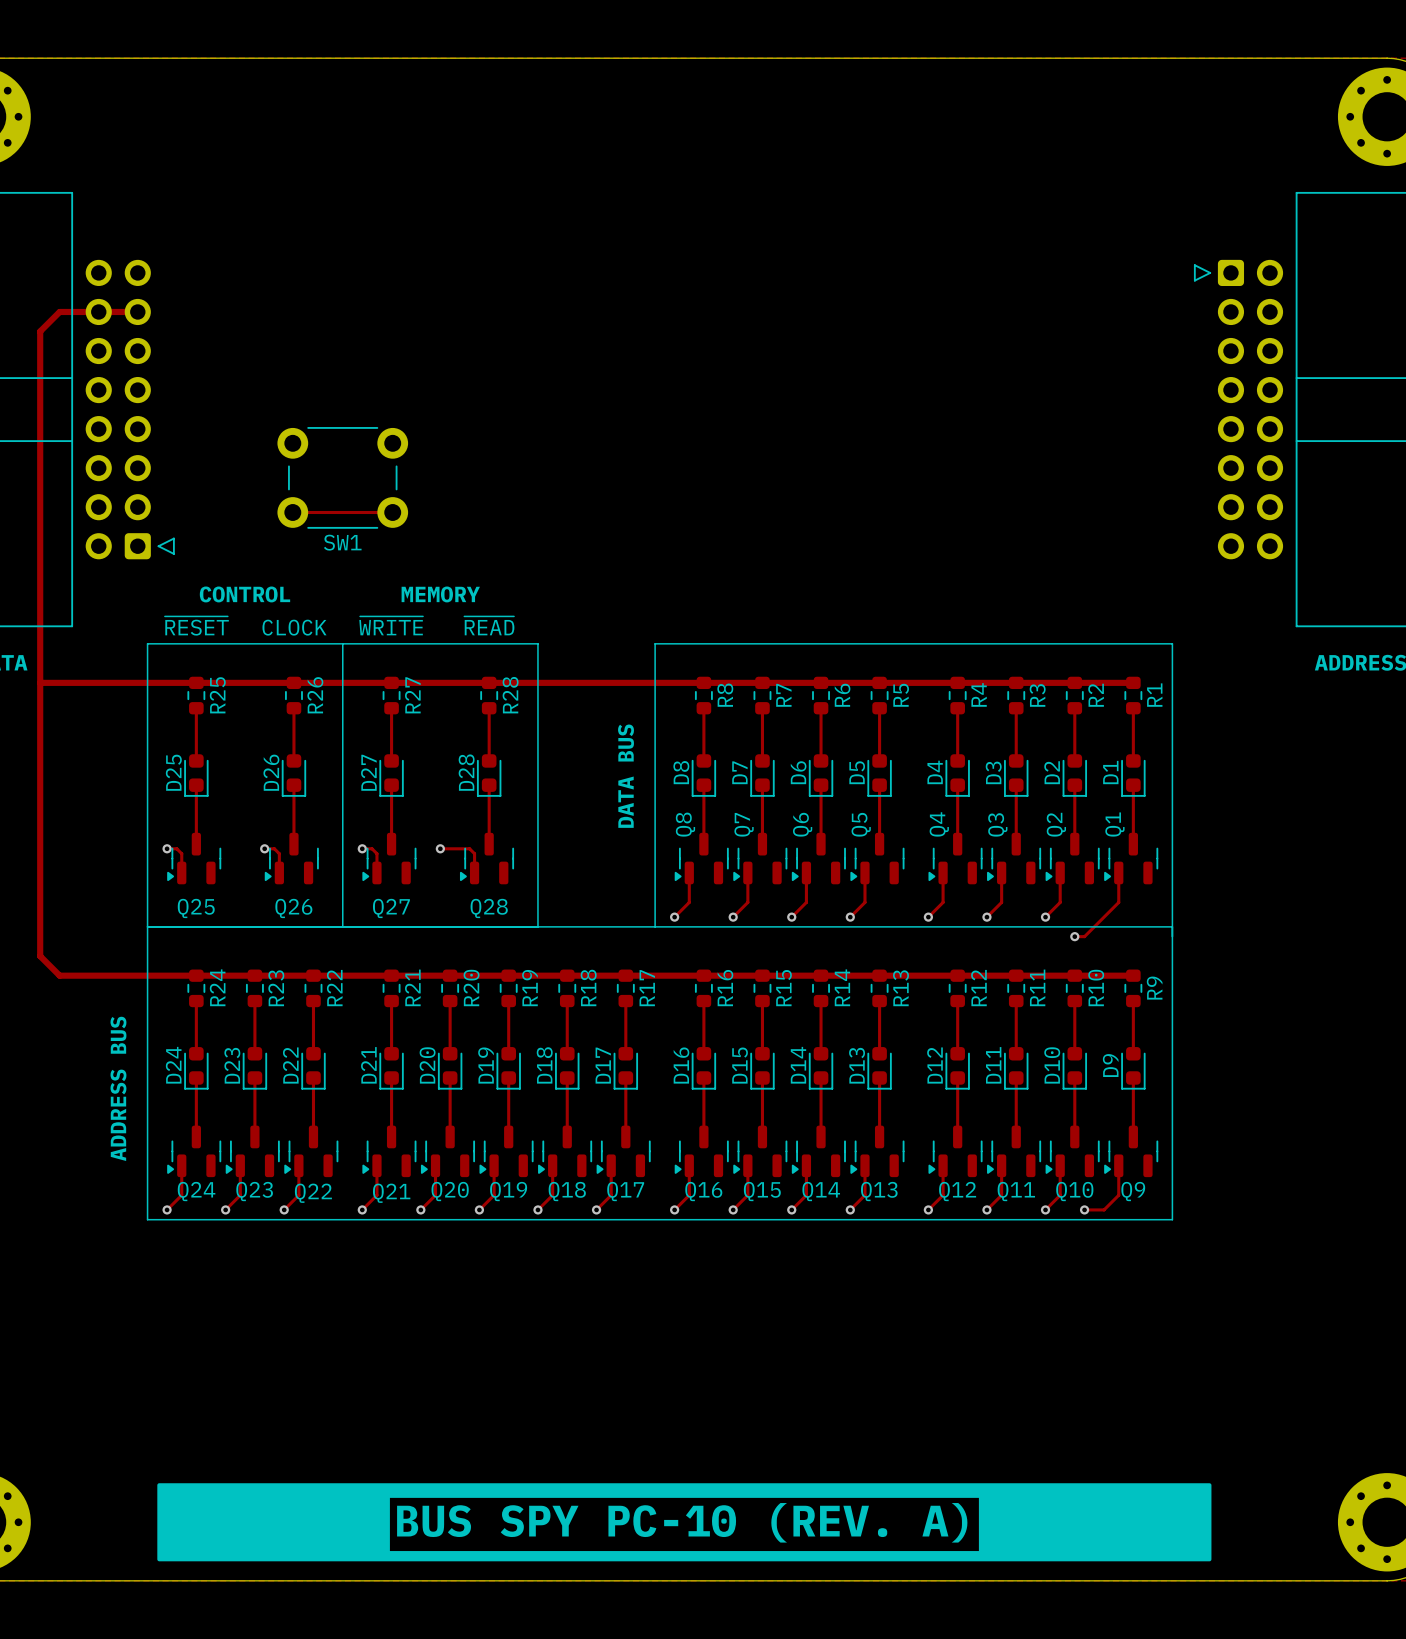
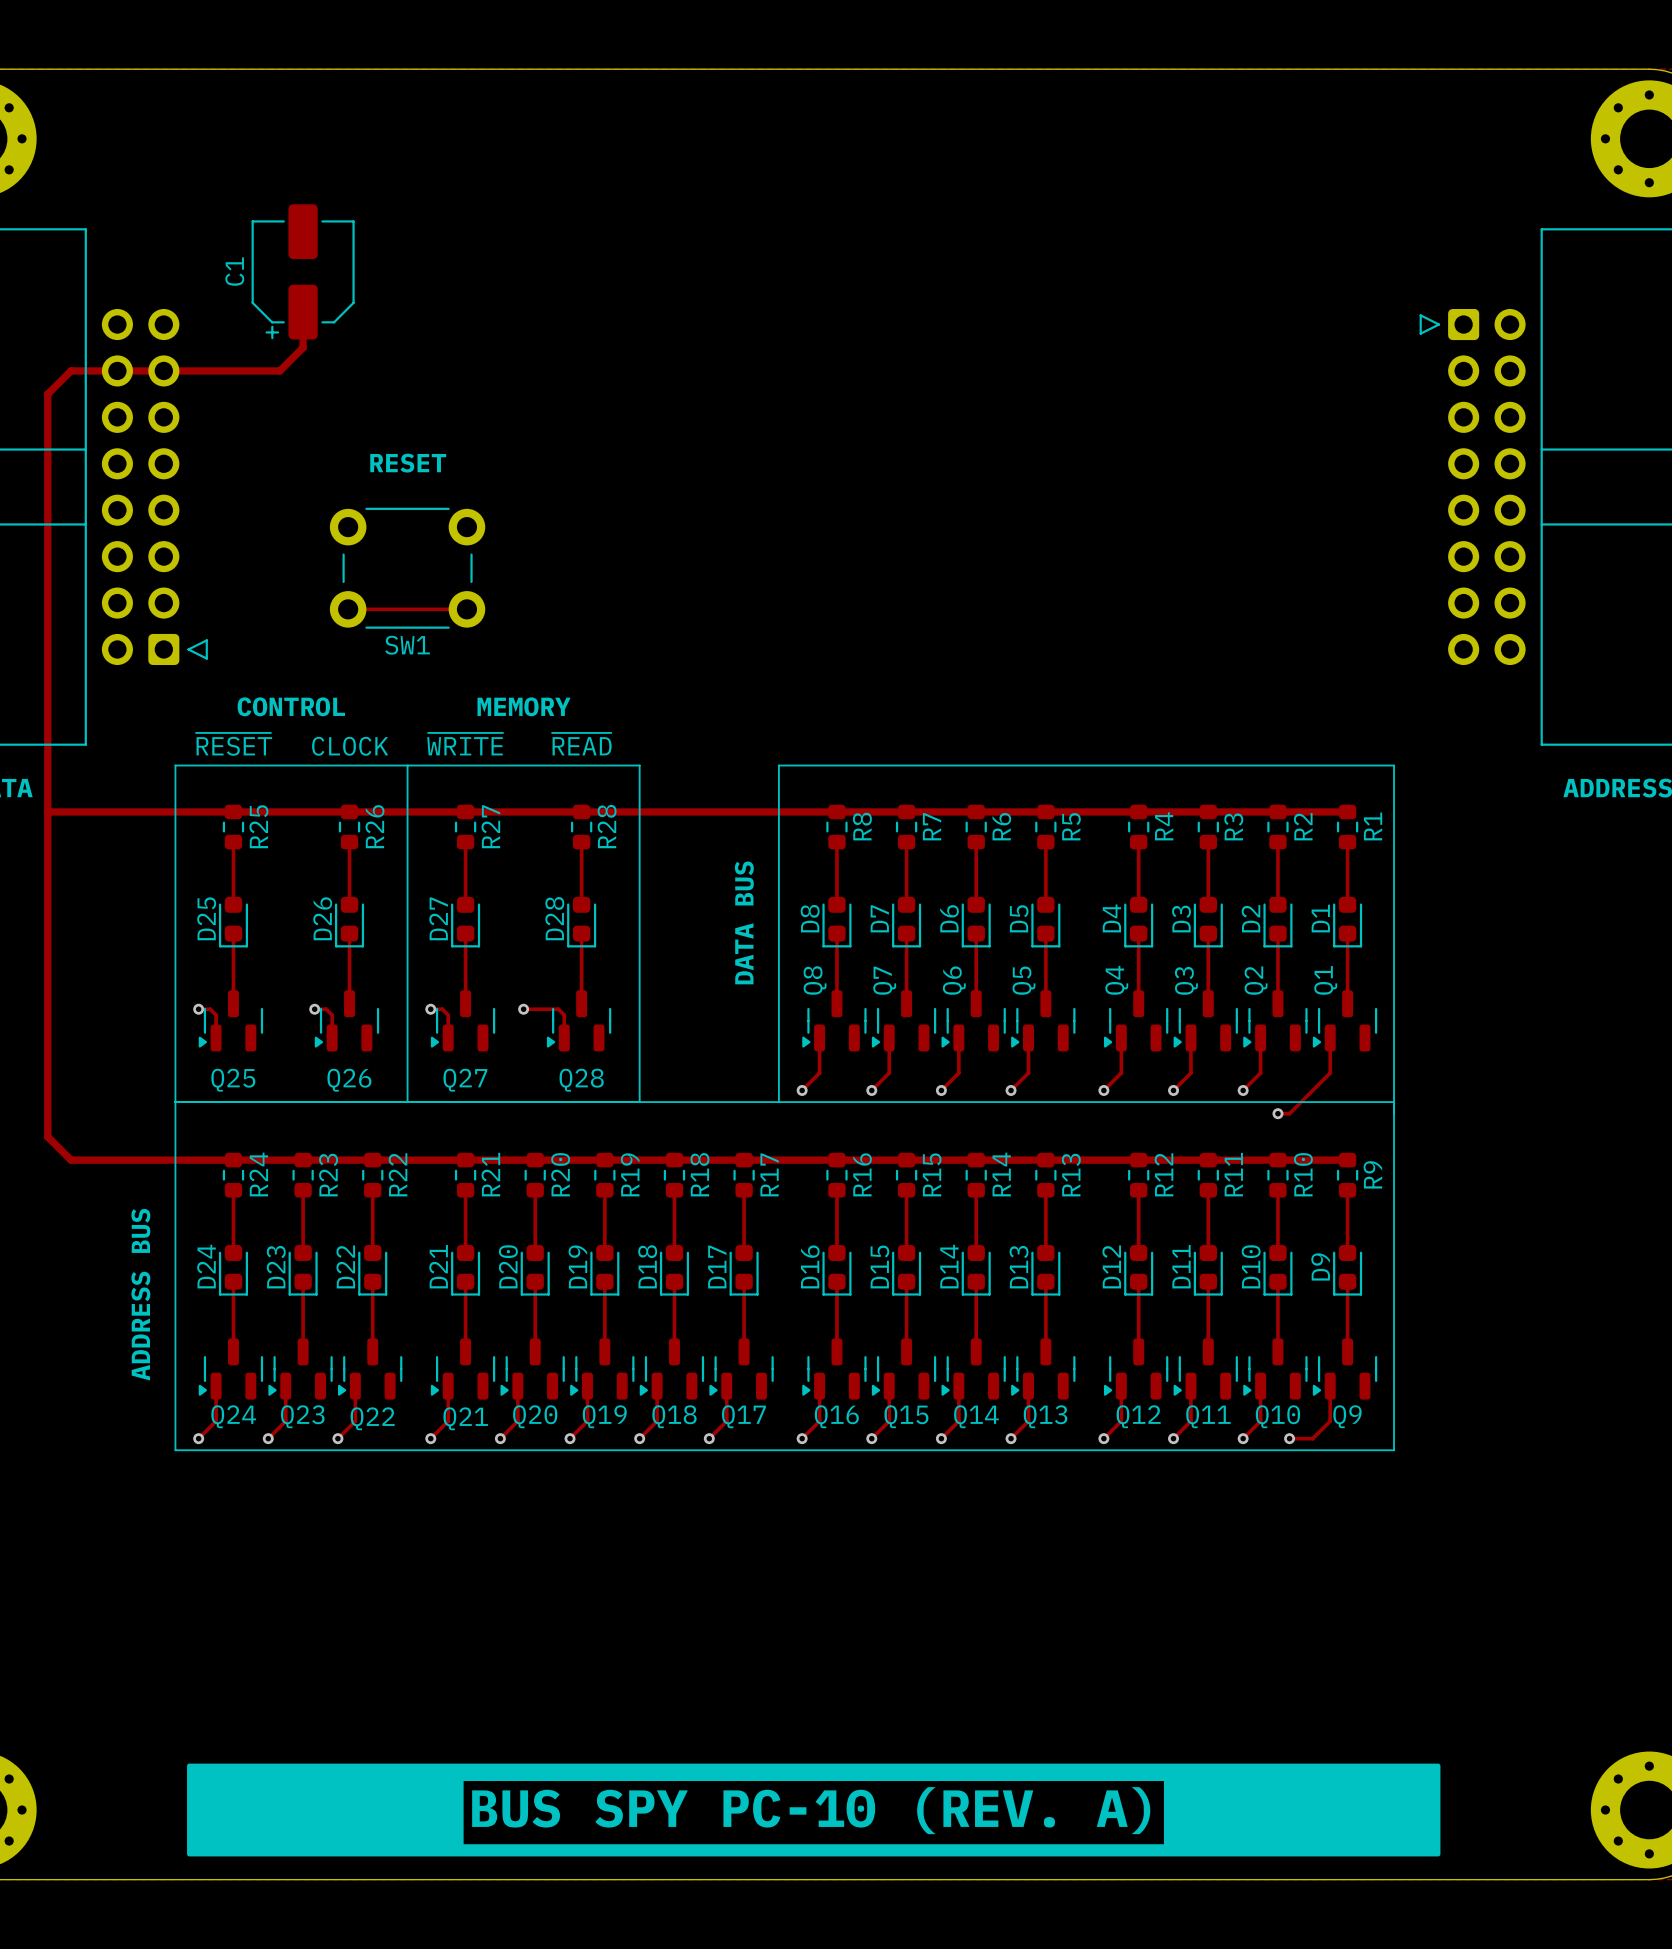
C1: none -> (303, 271)
track: none -> (303, 312) (303, 347) (279, 370) (163, 370)
text: none -> RESET (408, 463)

